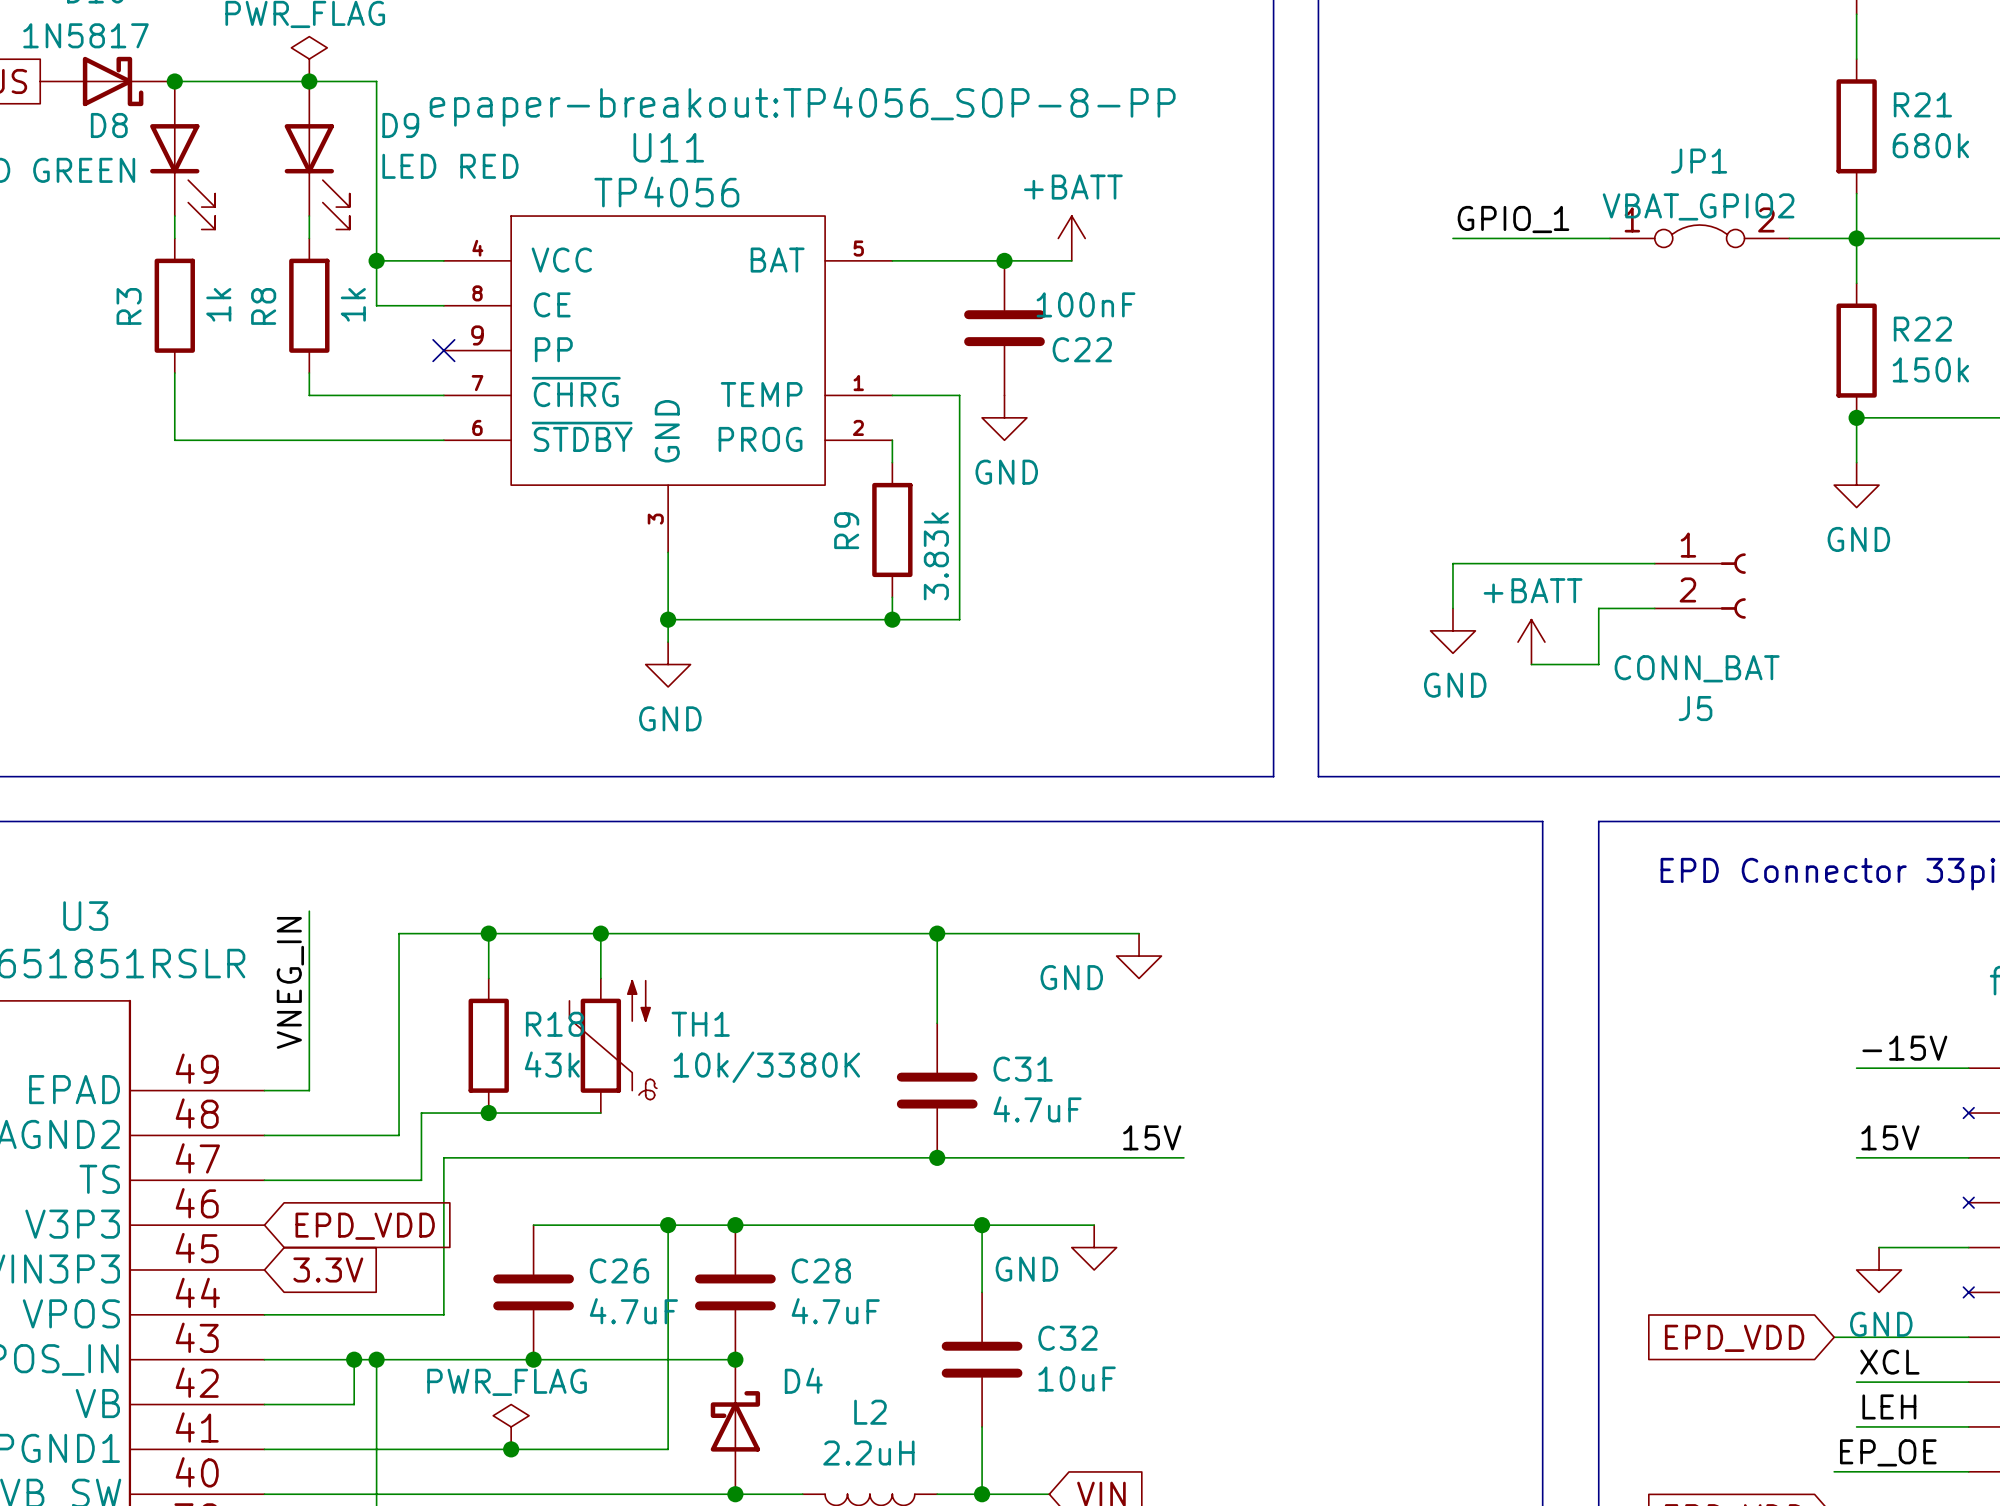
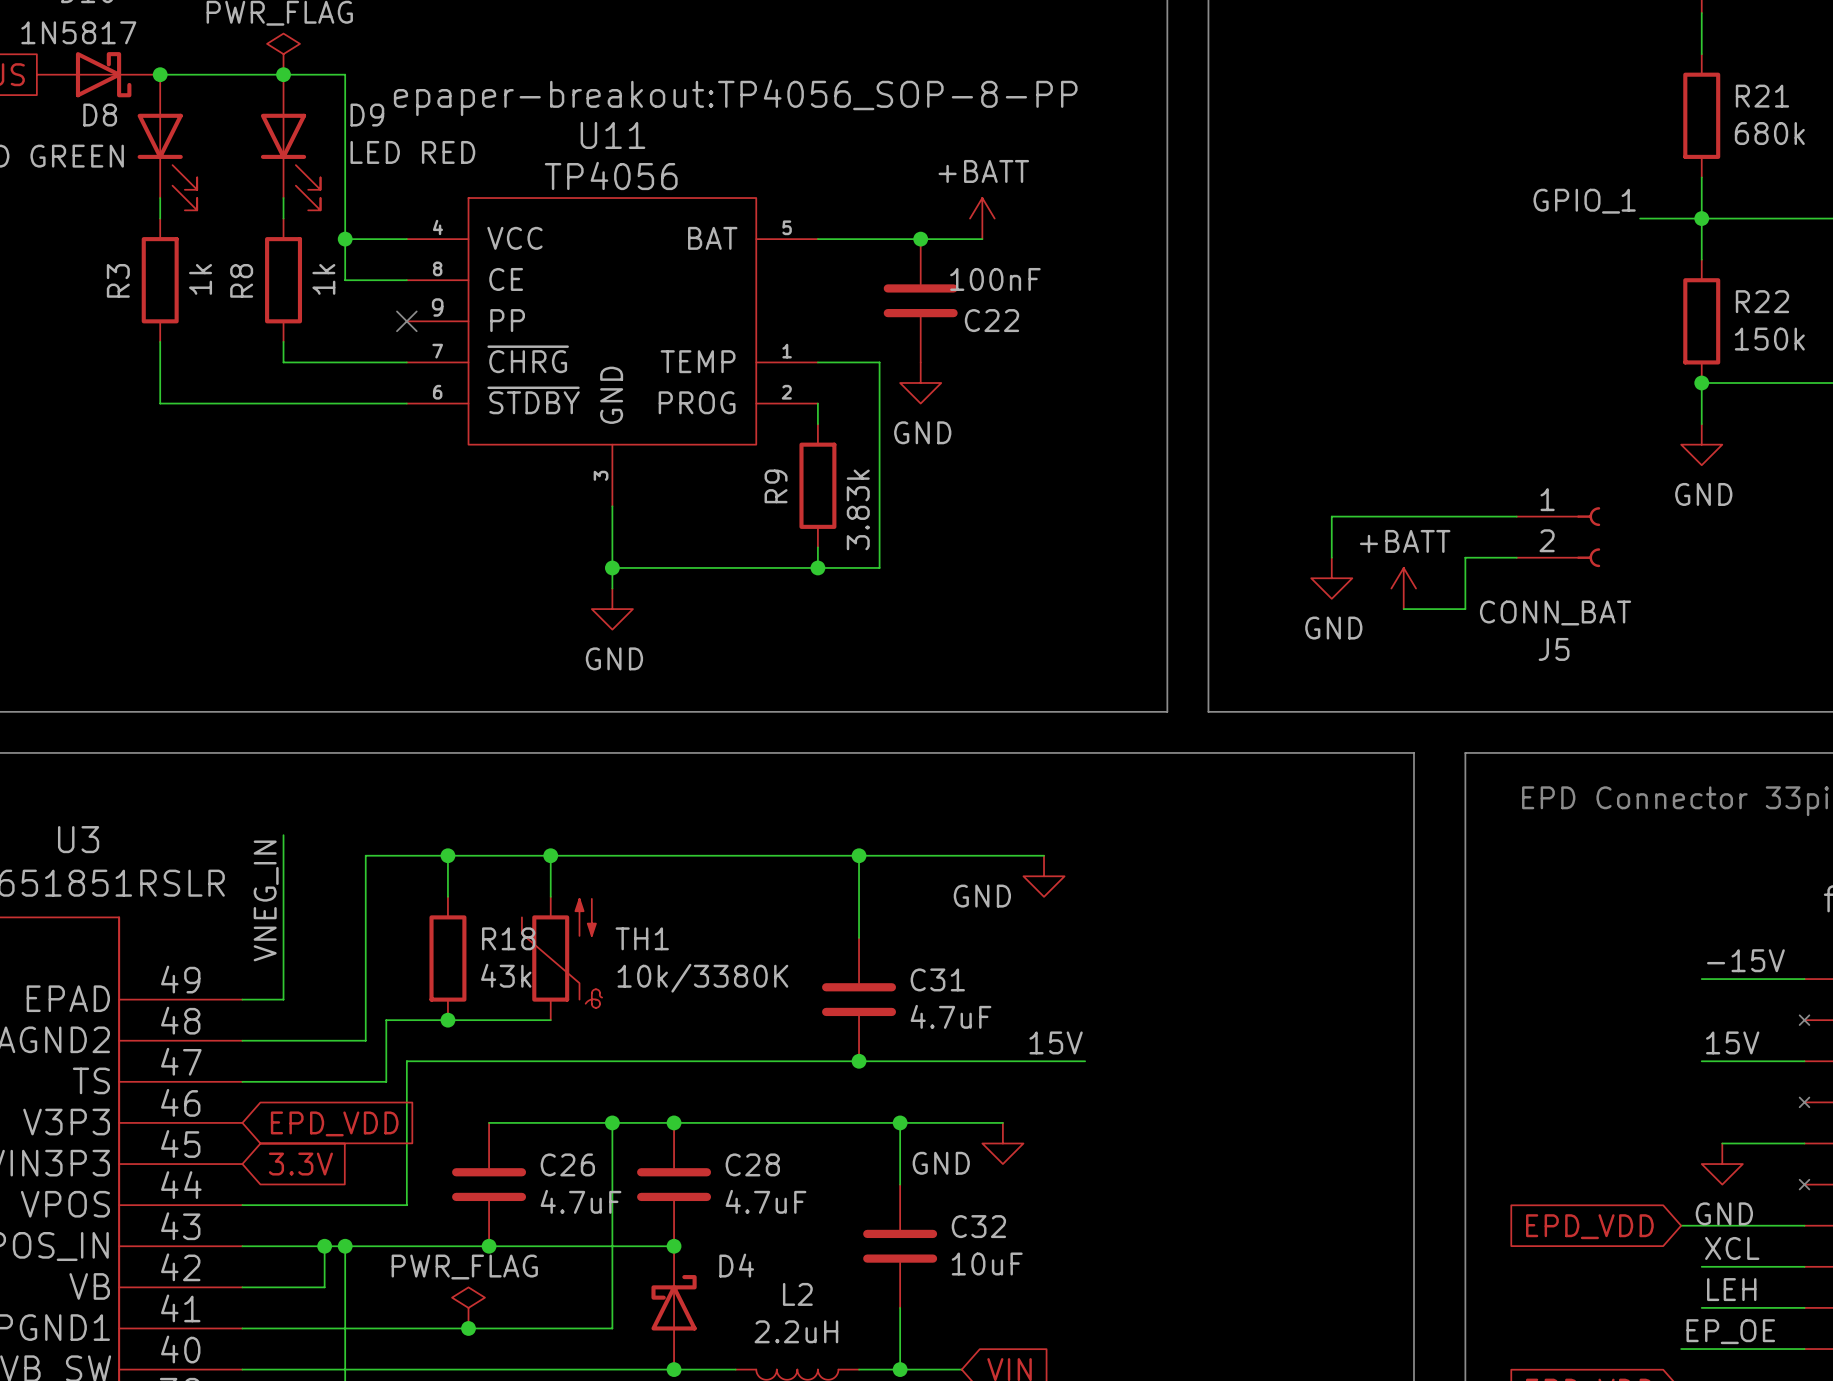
label position: GPIO_1 (1513, 219) -> GPIO_1 (1584, 201)
JP1: VBAT_GPIO2 (1699, 236) -> none
wire: (1452, 238) (1609, 238) -> none

